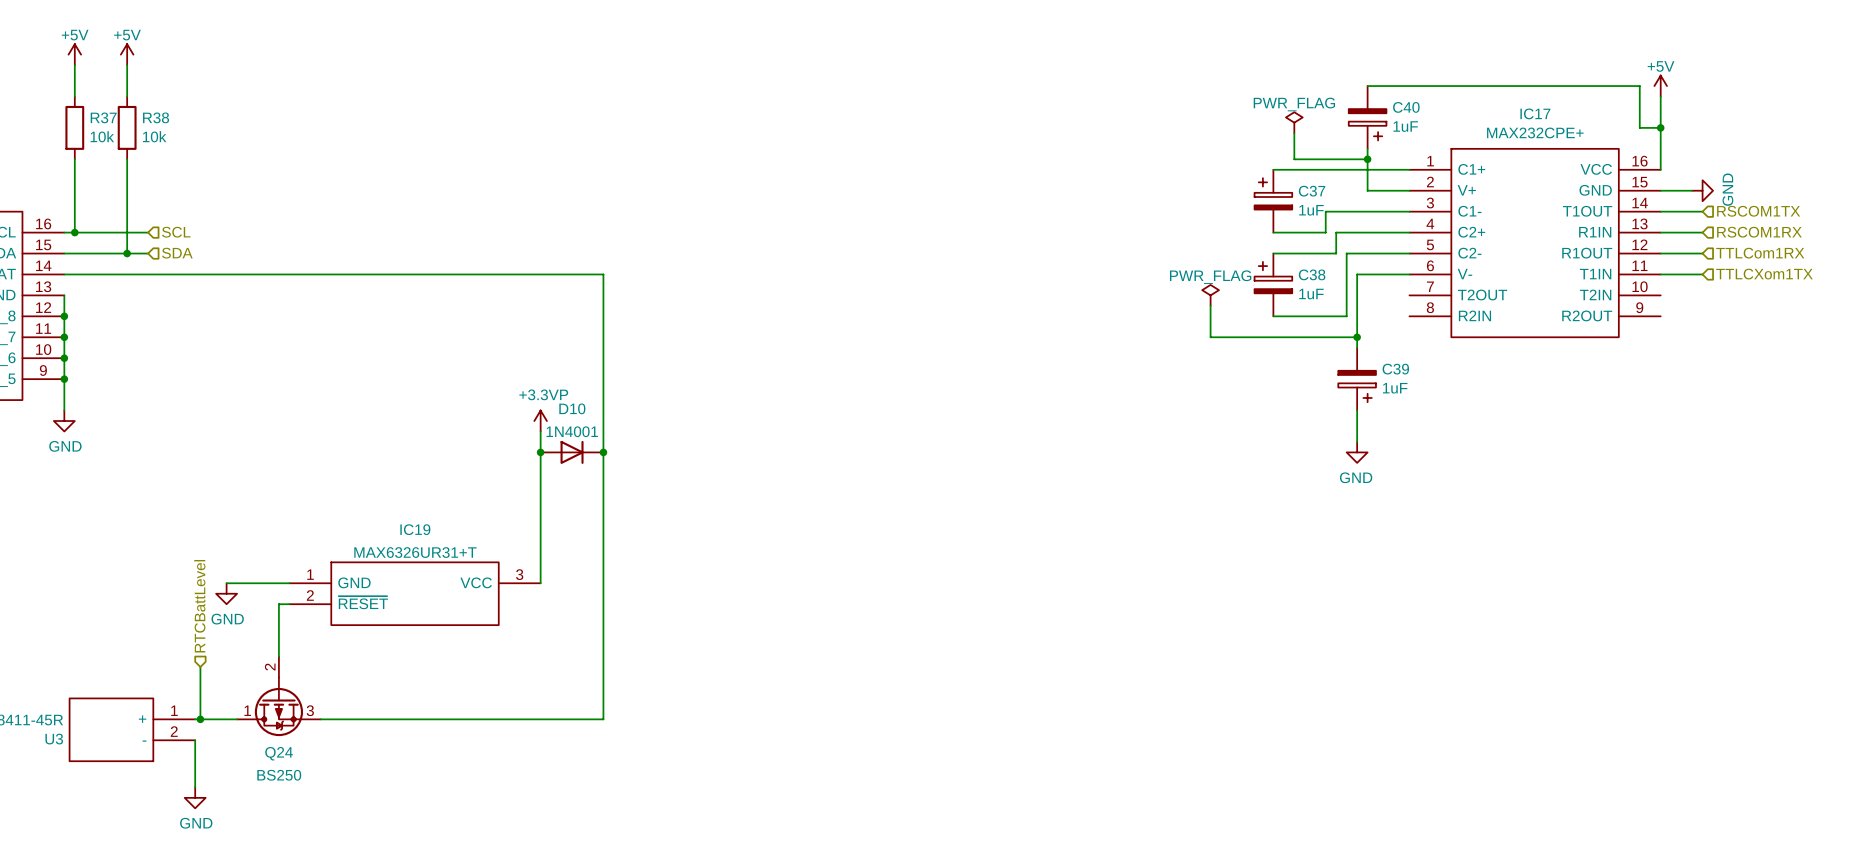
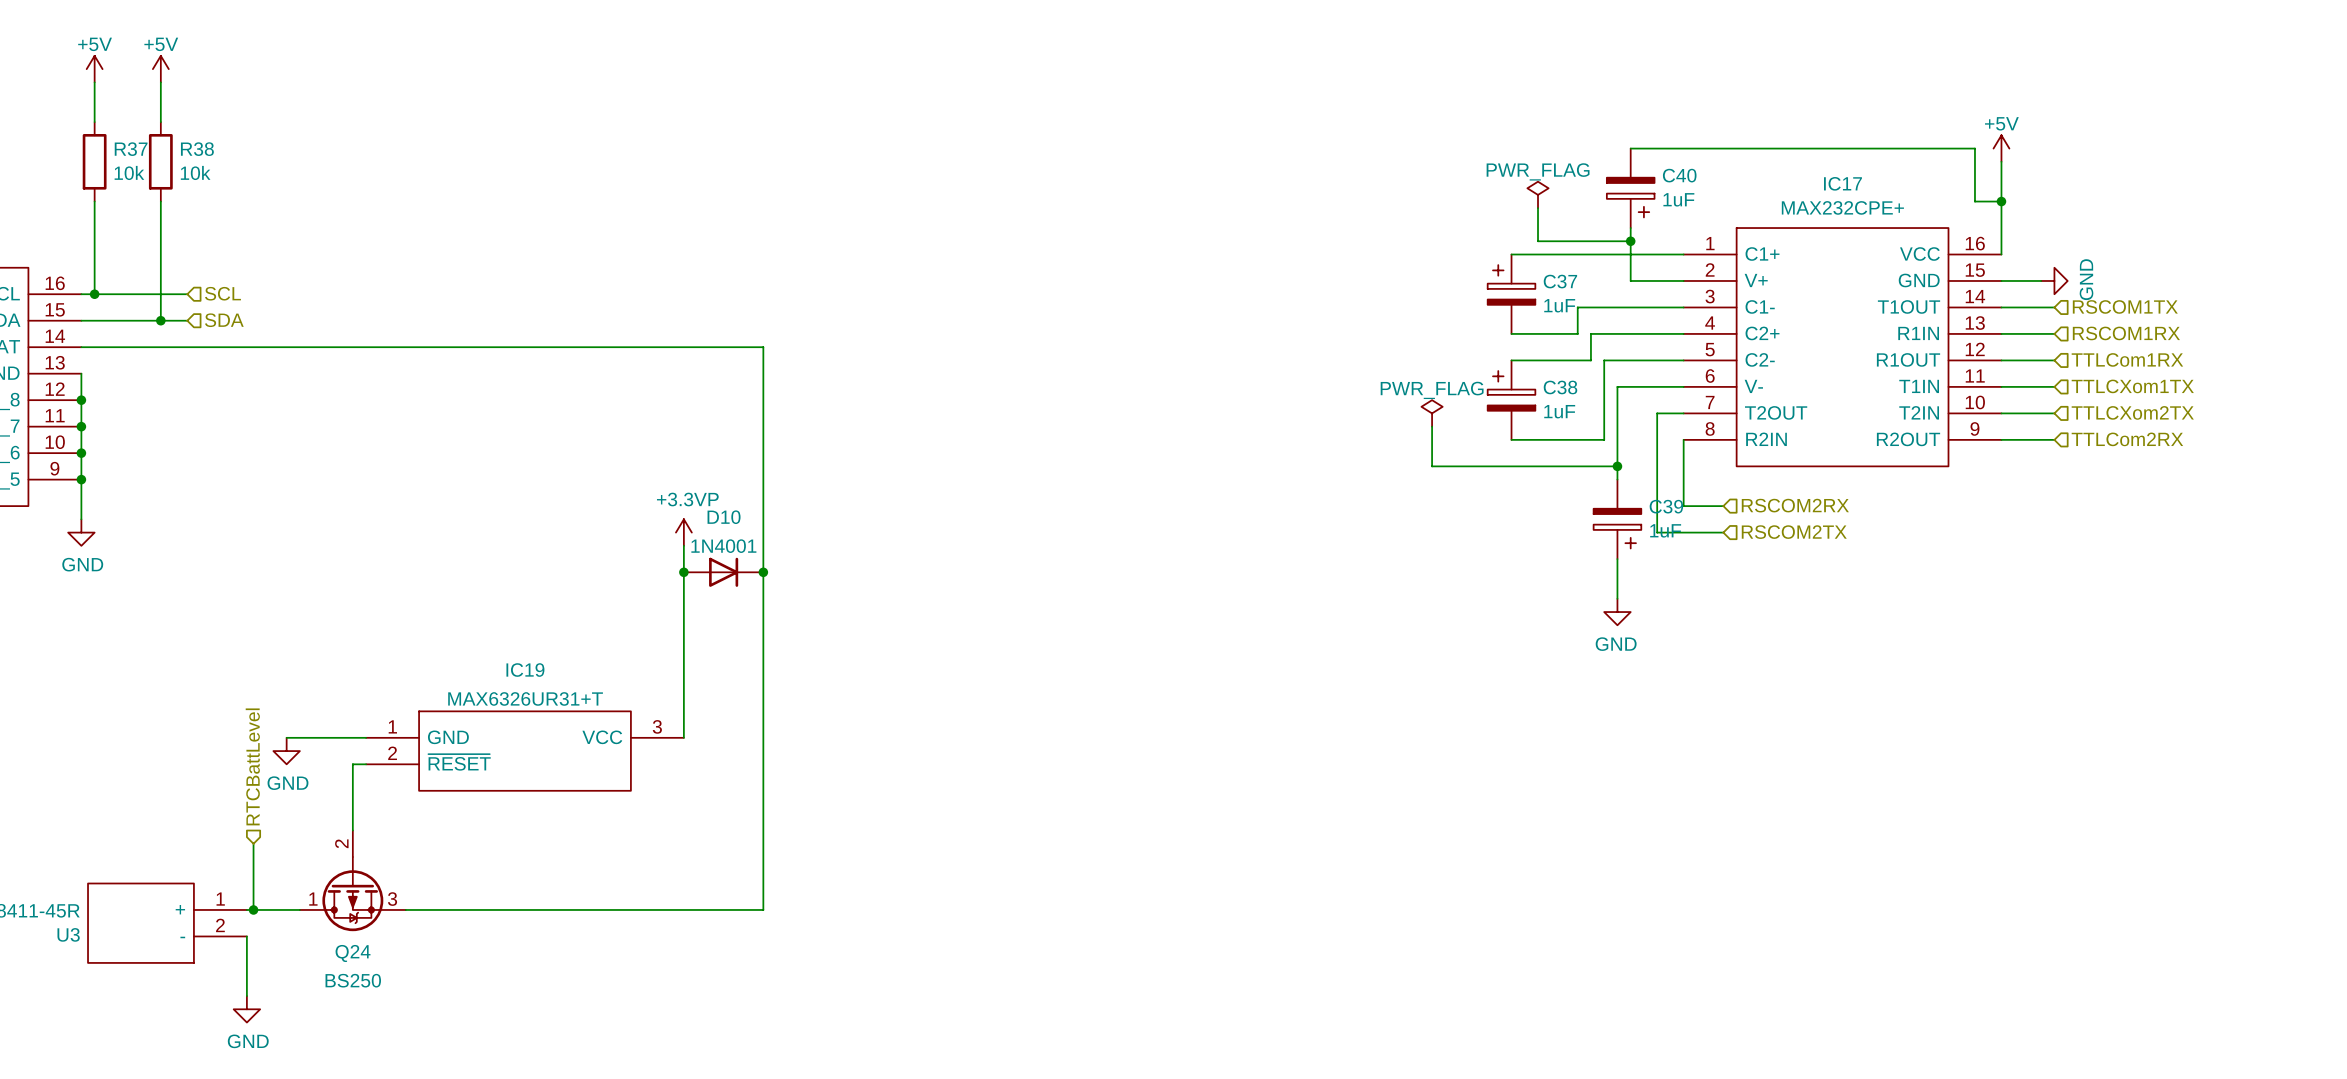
wire: (1367, 86) (1639, 86) (1639, 127) (1660, 127) -> (1630, 148) (1974, 148) (1974, 201) (2001, 201)
power symbol position: +5V (1660, 86) -> +5V (2001, 148)
wire: (1660, 96) (1660, 169) -> (2001, 161) (2001, 254)
C40 position: (1367, 117) -> (1630, 188)
power symbol: PWR_FLAG (1294, 122) -> none
junction: (1660, 127) -> none
wire: (1294, 133) (1294, 159) (1367, 159) -> (1538, 208) (1538, 241) (1630, 241)
wire: (1367, 148) (1367, 190) (1409, 190) -> (1630, 228) (1630, 280) (1683, 280)
power symbol: none -> PWR_FLAG (1538, 194)
junction: (1367, 159) -> none
junction: none -> (2001, 201)
wire: (1273, 169) (1409, 169) -> (1511, 254) (1683, 254)
junction: none -> (1630, 241)
wire: (1660, 190) (1692, 190) -> (2001, 280) (2041, 280)
power symbol position: GND (1702, 190) -> GND (2054, 280)
C37 position: (1273, 201) -> (1511, 294)
wire: (1409, 211) (1325, 211) (1325, 232) (1273, 232) -> (1683, 307) (1577, 307) (1577, 333) (1511, 333)
wire: (1660, 211) (1702, 211) -> (2001, 307) (2054, 307)
hierarchical label position: RSCOM1TX (1758, 211) -> RSCOM1TX (2125, 306)
wire: (1409, 232) (1336, 232) (1336, 253) (1273, 253) -> (1683, 333) (1590, 333) (1590, 360) (1511, 360)
wire: (1660, 232) (1702, 232) -> (2001, 333) (2054, 333)
hierarchical label position: RSCOM1RX (1759, 232) -> RSCOM1RX (2126, 333)
IC17 position: (1535, 243) -> (1842, 347)
wire: (1409, 253) (1346, 253) (1346, 316) (1273, 316) -> (1683, 360) (1604, 360) (1604, 439) (1511, 439)
wire: (1660, 253) (1702, 253) -> (2001, 360) (2054, 360)
hierarchical label position: TTLCom1RX (1760, 253) -> TTLCom1RX (2127, 359)
wire: (1409, 274) (1357, 274) (1357, 347) -> (1683, 386) (1617, 386) (1617, 479)
wire: (1660, 274) (1702, 274) -> (2001, 386) (2054, 386)
hierarchical label position: TTLCXom1TX (1764, 274) -> TTLCXom1TX (2132, 386)
C38 position: (1273, 284) -> (1511, 400)
power symbol: PWR_FLAG (1210, 295) -> none
wire: (1210, 305) (1210, 337) (1357, 337) -> (1432, 426) (1432, 466) (1617, 466)
power symbol: none -> PWR_FLAG (1432, 413)
wire: none -> (1683, 413) (1657, 413) (1657, 532) (1723, 532)
wire: none -> (2001, 413) (2054, 413)
hierarchical label: none -> TTLCXom2TX (2132, 412)
junction: (1357, 337) -> none
wire: none -> (1683, 439) (1683, 506) (1723, 506)
wire: none -> (2001, 439) (2054, 439)
hierarchical label: none -> TTLCom2RX (2127, 439)
junction: none -> (1617, 466)
C39 position: (1357, 379) -> (1617, 519)
hierarchical label: none -> RSCOM2RX (1795, 505)
wire: (1357, 410) (1357, 441) -> (1617, 559) (1617, 598)
hierarchical label: none -> RSCOM2TX (1794, 532)
power symbol position: GND (1357, 452) -> GND (1617, 612)

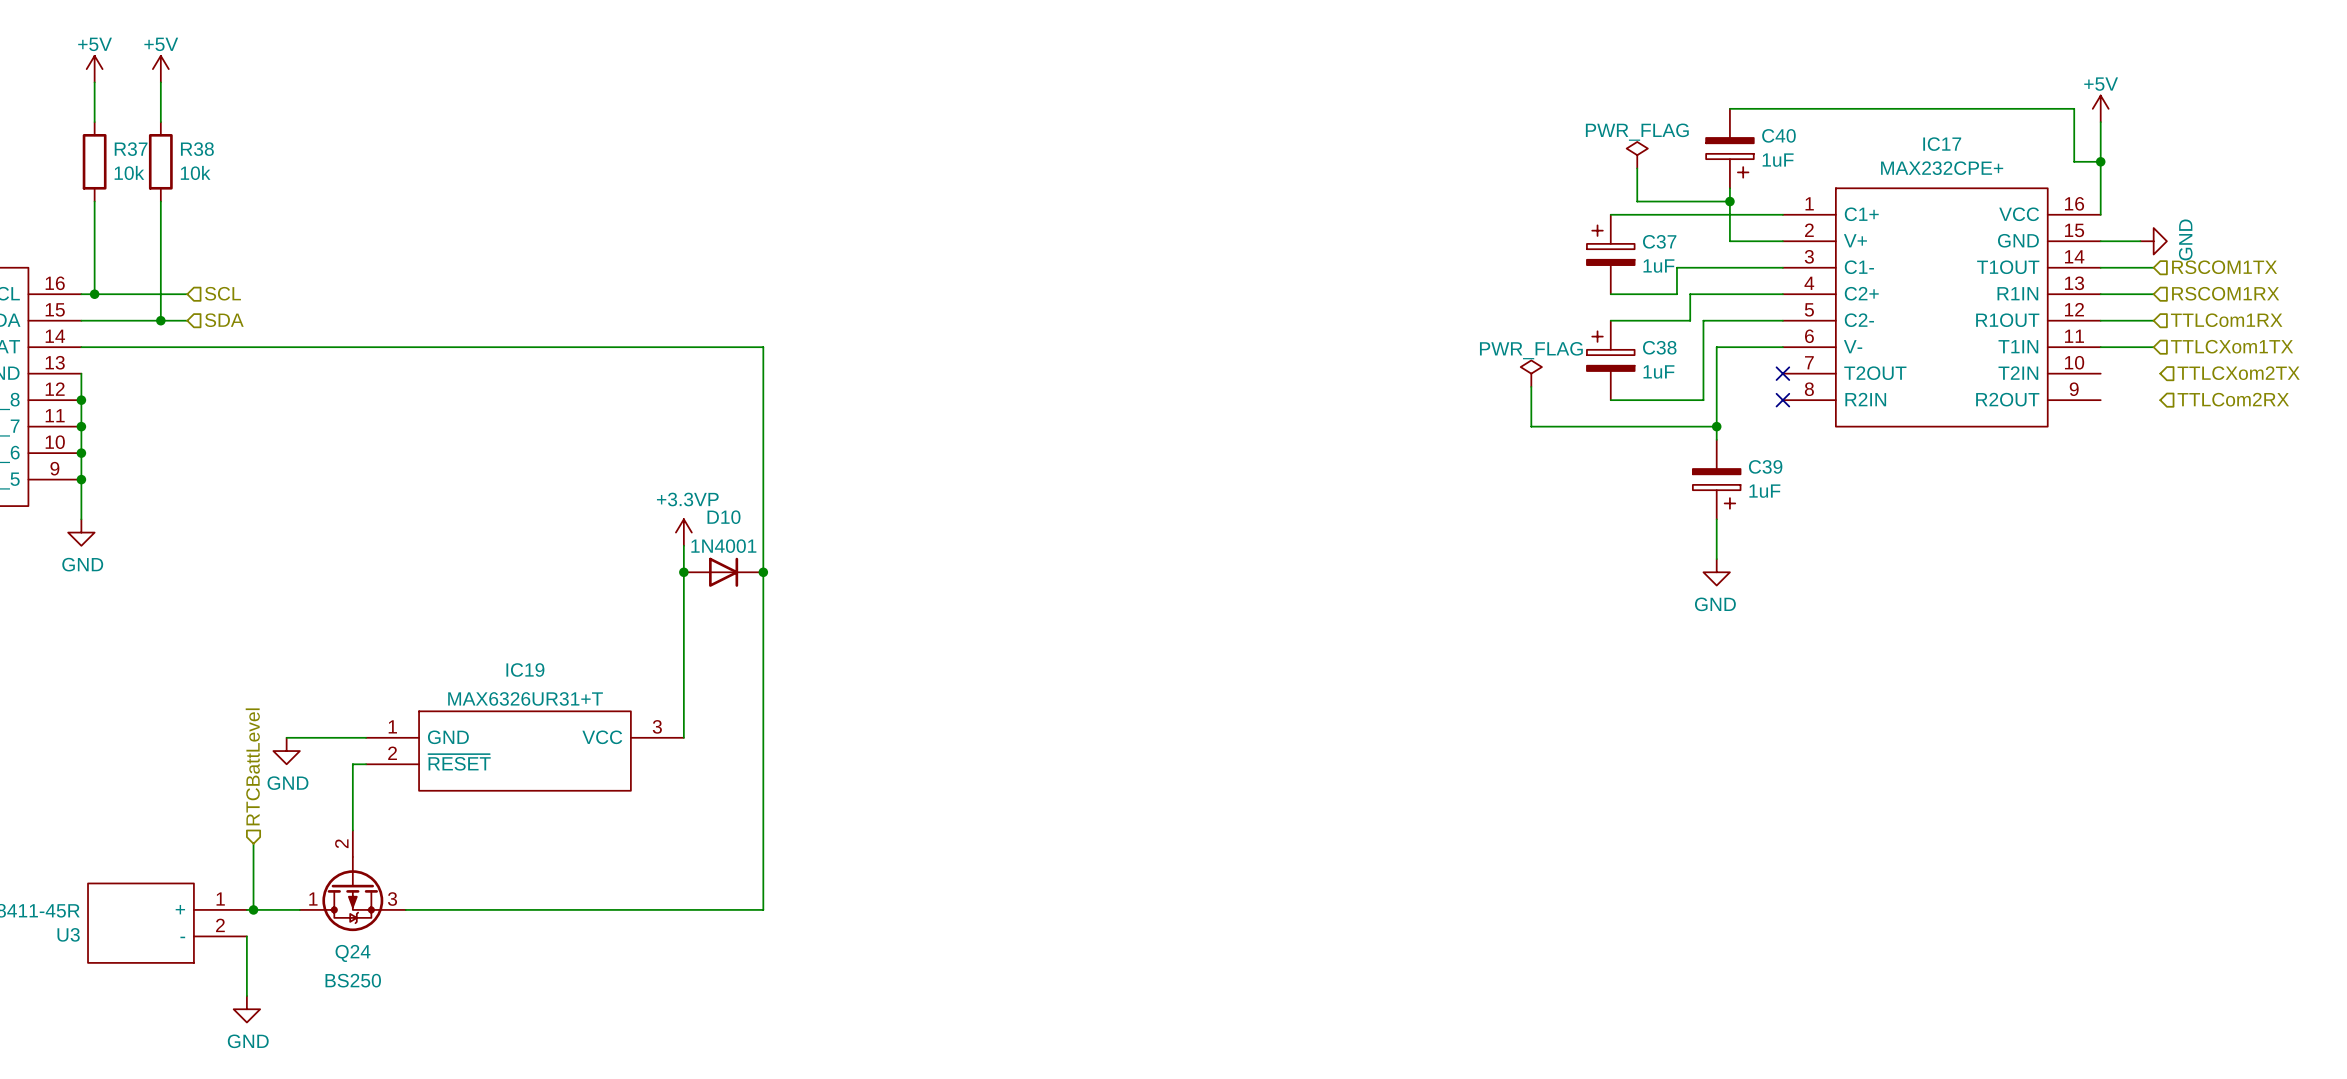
wire: (1630, 148) (1974, 148) (1974, 201) (2001, 201) -> (1729, 108) (2074, 108) (2074, 161) (2100, 161)
power symbol position: +5V (2001, 148) -> +5V (2100, 108)
power symbol: none -> PWR_FLAG (1637, 155)
wire: (2001, 161) (2001, 254) -> (2100, 122) (2100, 214)
junction: none -> (2100, 161)
C40 position: (1630, 188) -> (1729, 148)
power symbol: PWR_FLAG (1538, 194) -> none
junction: none -> (1729, 201)
junction: (2001, 201) -> none
wire: (1538, 208) (1538, 241) (1630, 241) -> (1637, 168) (1637, 201) (1729, 201)
wire: (1630, 228) (1630, 280) (1683, 280) -> (1729, 188) (1729, 241) (1782, 241)
junction: (1630, 241) -> none
wire: (1511, 254) (1683, 254) -> (1610, 214) (1782, 214)
wire: (2001, 280) (2041, 280) -> (2100, 241) (2140, 241)
power symbol position: GND (2054, 280) -> GND (2153, 241)
C37 position: (1511, 294) -> (1610, 254)
hierarchical label position: RSCOM1TX (2125, 306) -> RSCOM1TX (2224, 267)
wire: (1683, 307) (1577, 307) (1577, 333) (1511, 333) -> (1782, 267) (1676, 267) (1676, 294) (1610, 294)
wire: (2001, 307) (2054, 307) -> (2100, 267) (2153, 267)
wire: (1683, 333) (1590, 333) (1590, 360) (1511, 360) -> (1782, 294) (1690, 294) (1690, 320) (1610, 320)
wire: (2001, 333) (2054, 333) -> (2100, 294) (2153, 294)
hierarchical label position: RSCOM1RX (2126, 333) -> RSCOM1RX (2225, 293)
IC17 position: (1842, 347) -> (1941, 307)
hierarchical label position: TTLCom1RX (2127, 359) -> TTLCom1RX (2226, 320)
wire: (1683, 360) (1604, 360) (1604, 439) (1511, 439) -> (1782, 320) (1703, 320) (1703, 400) (1610, 400)
wire: (2001, 360) (2054, 360) -> (2100, 320) (2153, 320)
power symbol: none -> PWR_FLAG (1531, 373)
no-connect mark: none -> (1782, 373)
wire: (1683, 386) (1617, 386) (1617, 479) -> (1782, 347) (1716, 347) (1716, 439)
wire: (2001, 386) (2054, 386) -> (2100, 347) (2153, 347)
hierarchical label position: TTLCXom1TX (2132, 386) -> TTLCXom1TX (2231, 346)
C38 position: (1511, 400) -> (1610, 360)
no-connect mark: none -> (1782, 400)
hierarchical label position: TTLCXom2TX (2132, 412) -> TTLCXom2TX (2238, 373)
power symbol: PWR_FLAG (1432, 413) -> none
wire: (1683, 413) (1657, 413) (1657, 532) (1723, 532) -> none
wire: (2001, 413) (2054, 413) -> none
wire: (1432, 426) (1432, 466) (1617, 466) -> (1531, 386) (1531, 426) (1716, 426)
junction: none -> (1716, 426)
wire: (1683, 439) (1683, 506) (1723, 506) -> none
wire: (2001, 439) (2054, 439) -> none
hierarchical label position: TTLCom2RX (2127, 439) -> TTLCom2RX (2233, 399)
junction: (1617, 466) -> none
hierarchical label: RSCOM2RX (1795, 505) -> none
C39 position: (1617, 519) -> (1716, 479)
hierarchical label: RSCOM2TX (1794, 532) -> none
wire: (1617, 559) (1617, 598) -> (1716, 519) (1716, 559)
power symbol position: GND (1617, 612) -> GND (1716, 572)

